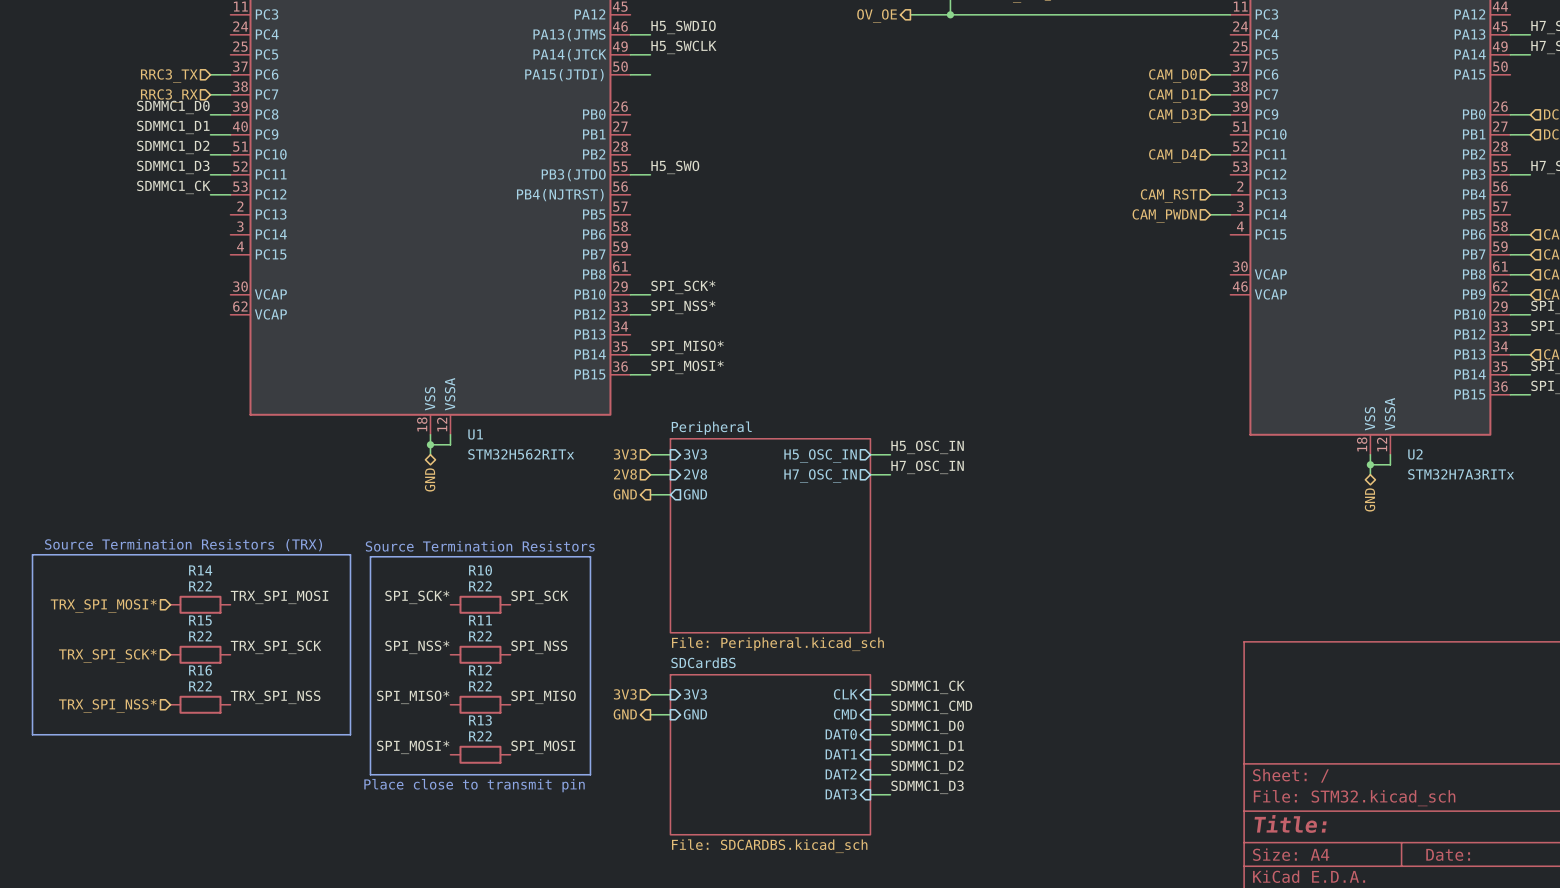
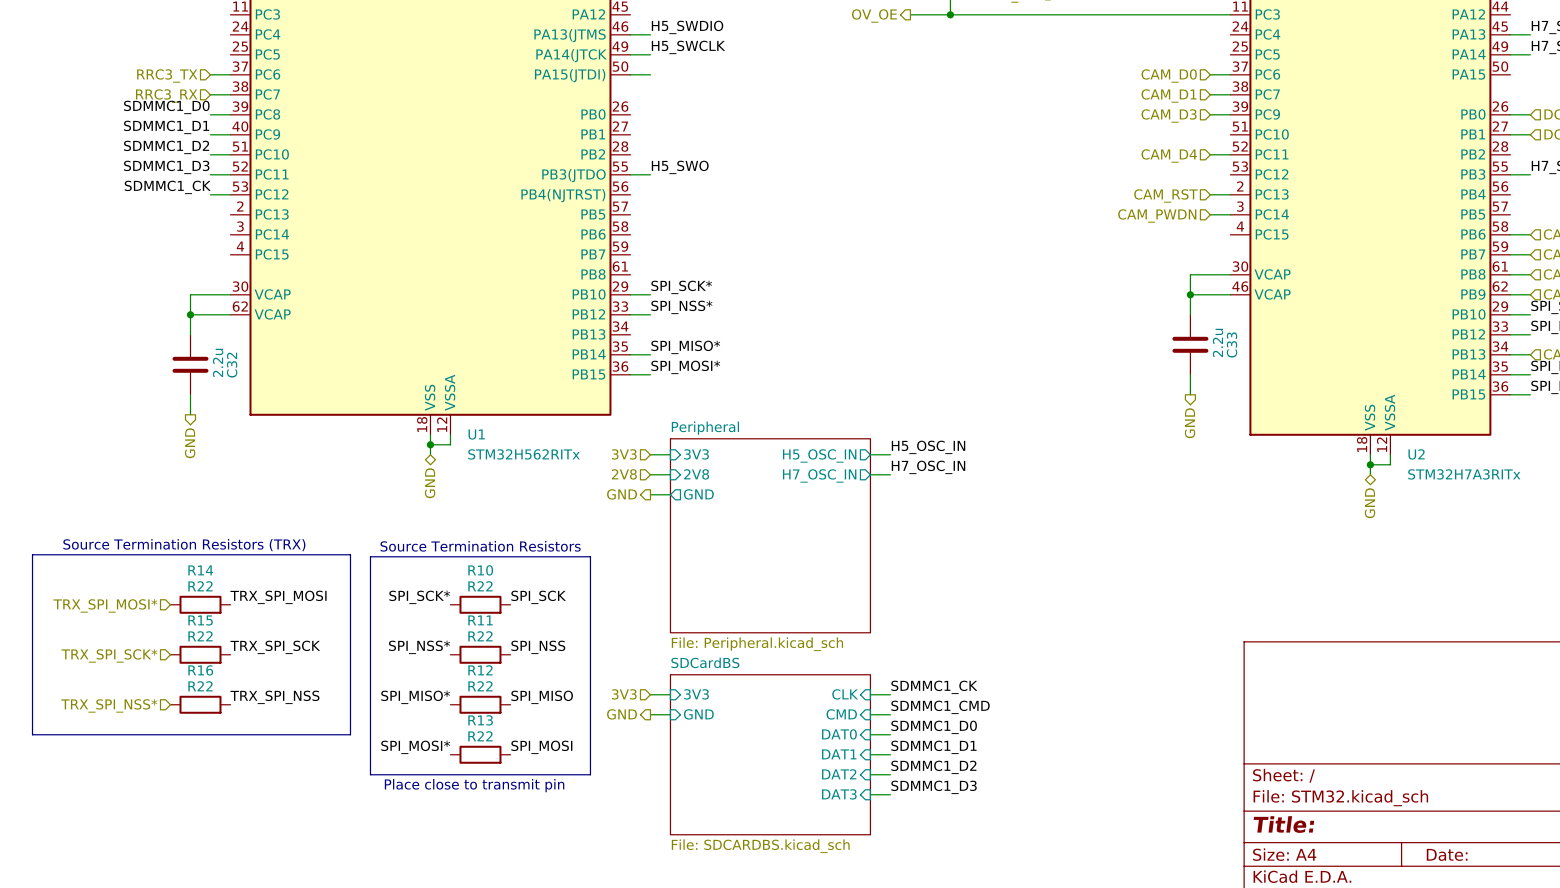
wire: none -> (1230, 274) (1190, 274) (1190, 314)
wire: none -> (230, 294) (190, 294) (190, 334)
wire: none -> (1190, 294) (1230, 294)
junction: none -> (1190, 294)
wire: none -> (190, 314) (230, 314)
junction: none -> (190, 314)
C33: none -> 2.2u (1190, 344)
C32: none -> 2.2u (190, 364)
wire: none -> (1190, 374) (1190, 394)
wire: none -> (190, 394) (190, 414)
hierarchical label: none -> GND (1190, 423)
hierarchical label: none -> GND (190, 443)

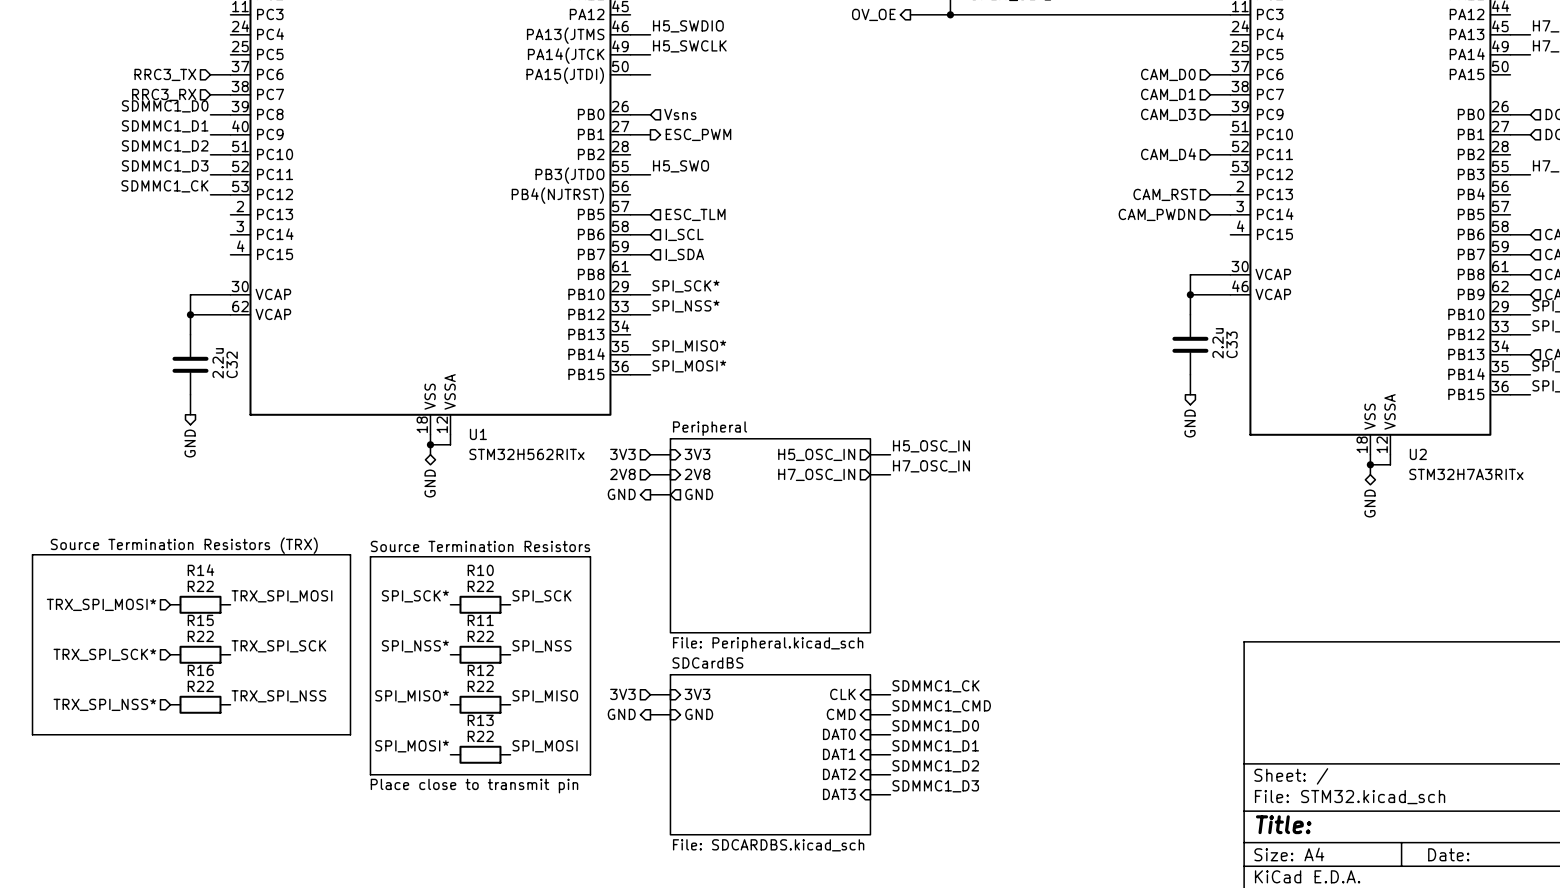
wire: none -> (630, 114) (650, 114)
hierarchical label: none -> Vsns (680, 114)
wire: none -> (630, 134) (650, 134)
hierarchical label: none -> ESC_PWM (698, 134)
wire: none -> (630, 214) (650, 214)
hierarchical label: none -> ESC_TLM (695, 214)
wire: none -> (630, 234) (650, 234)
hierarchical label: none -> I_SCL (684, 234)
wire: none -> (630, 254) (650, 254)
hierarchical label: none -> I_SDA (684, 254)

